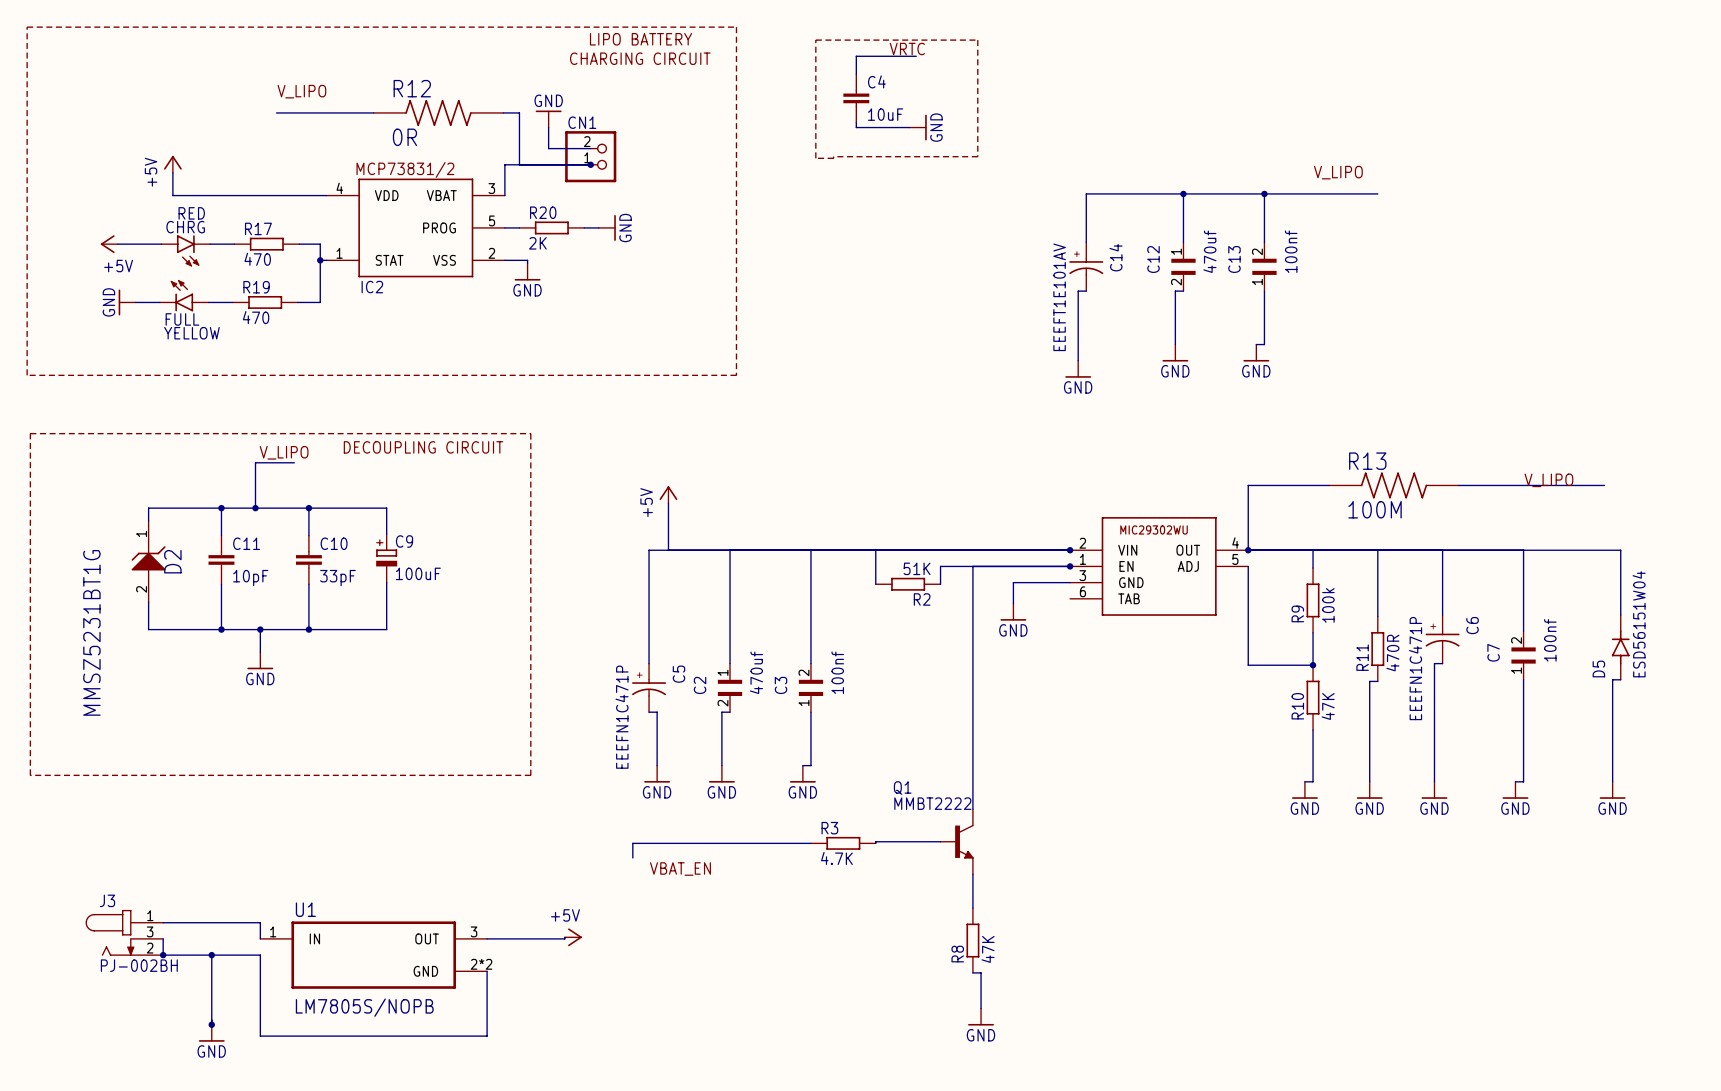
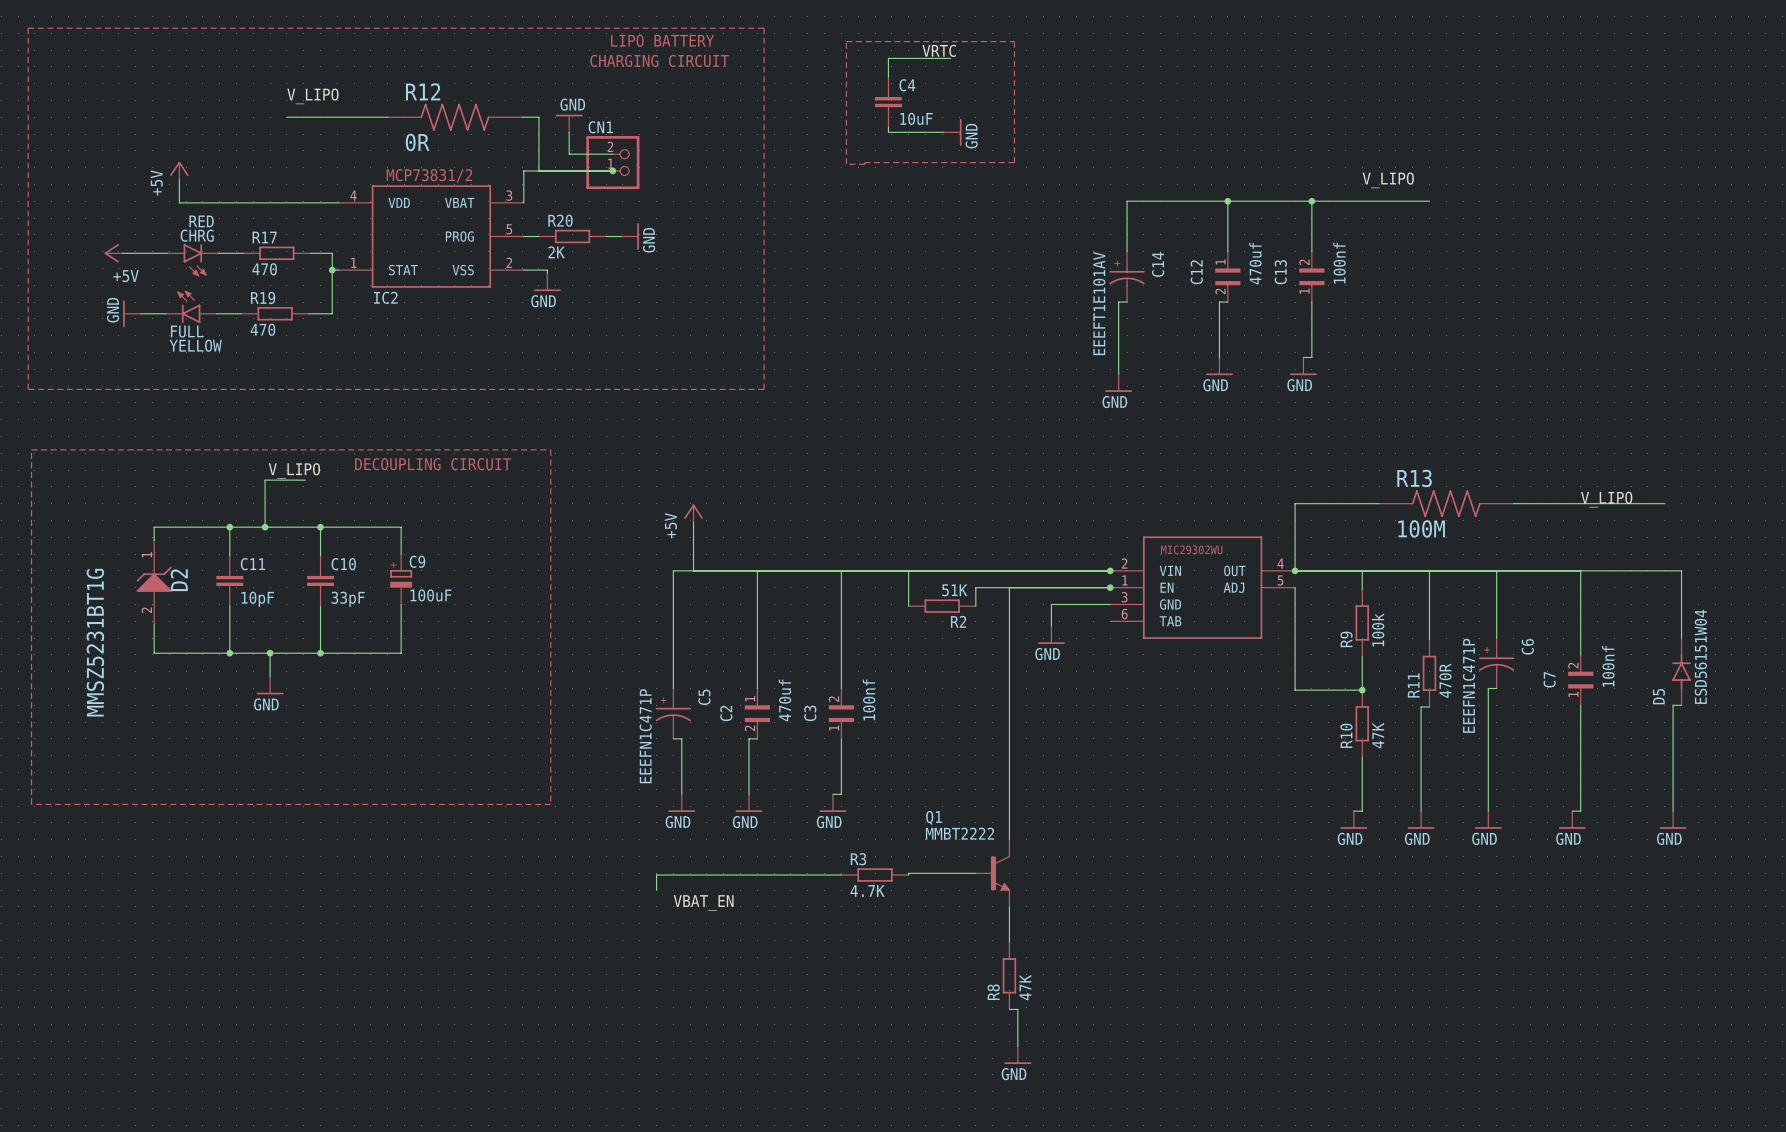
wire: (163, 922) (260, 922) (260, 938) -> none
J3: PJ-002BH (124, 932) -> none
wire: (564, 937) (564, 938) (487, 938) -> none
power symbol: +5V (573, 937) -> none
wire: (163, 938) (163, 955) (260, 955) (260, 1036) (487, 1036) (487, 971) -> none
junction: (163, 955) -> none
wire: (211, 955) (211, 1024) -> none
junction: (211, 955) -> none
U1: LM7805S/NOPB (373, 955) -> none
junction: (211, 1024) -> none
power symbol: GND (211, 1033) -> none

